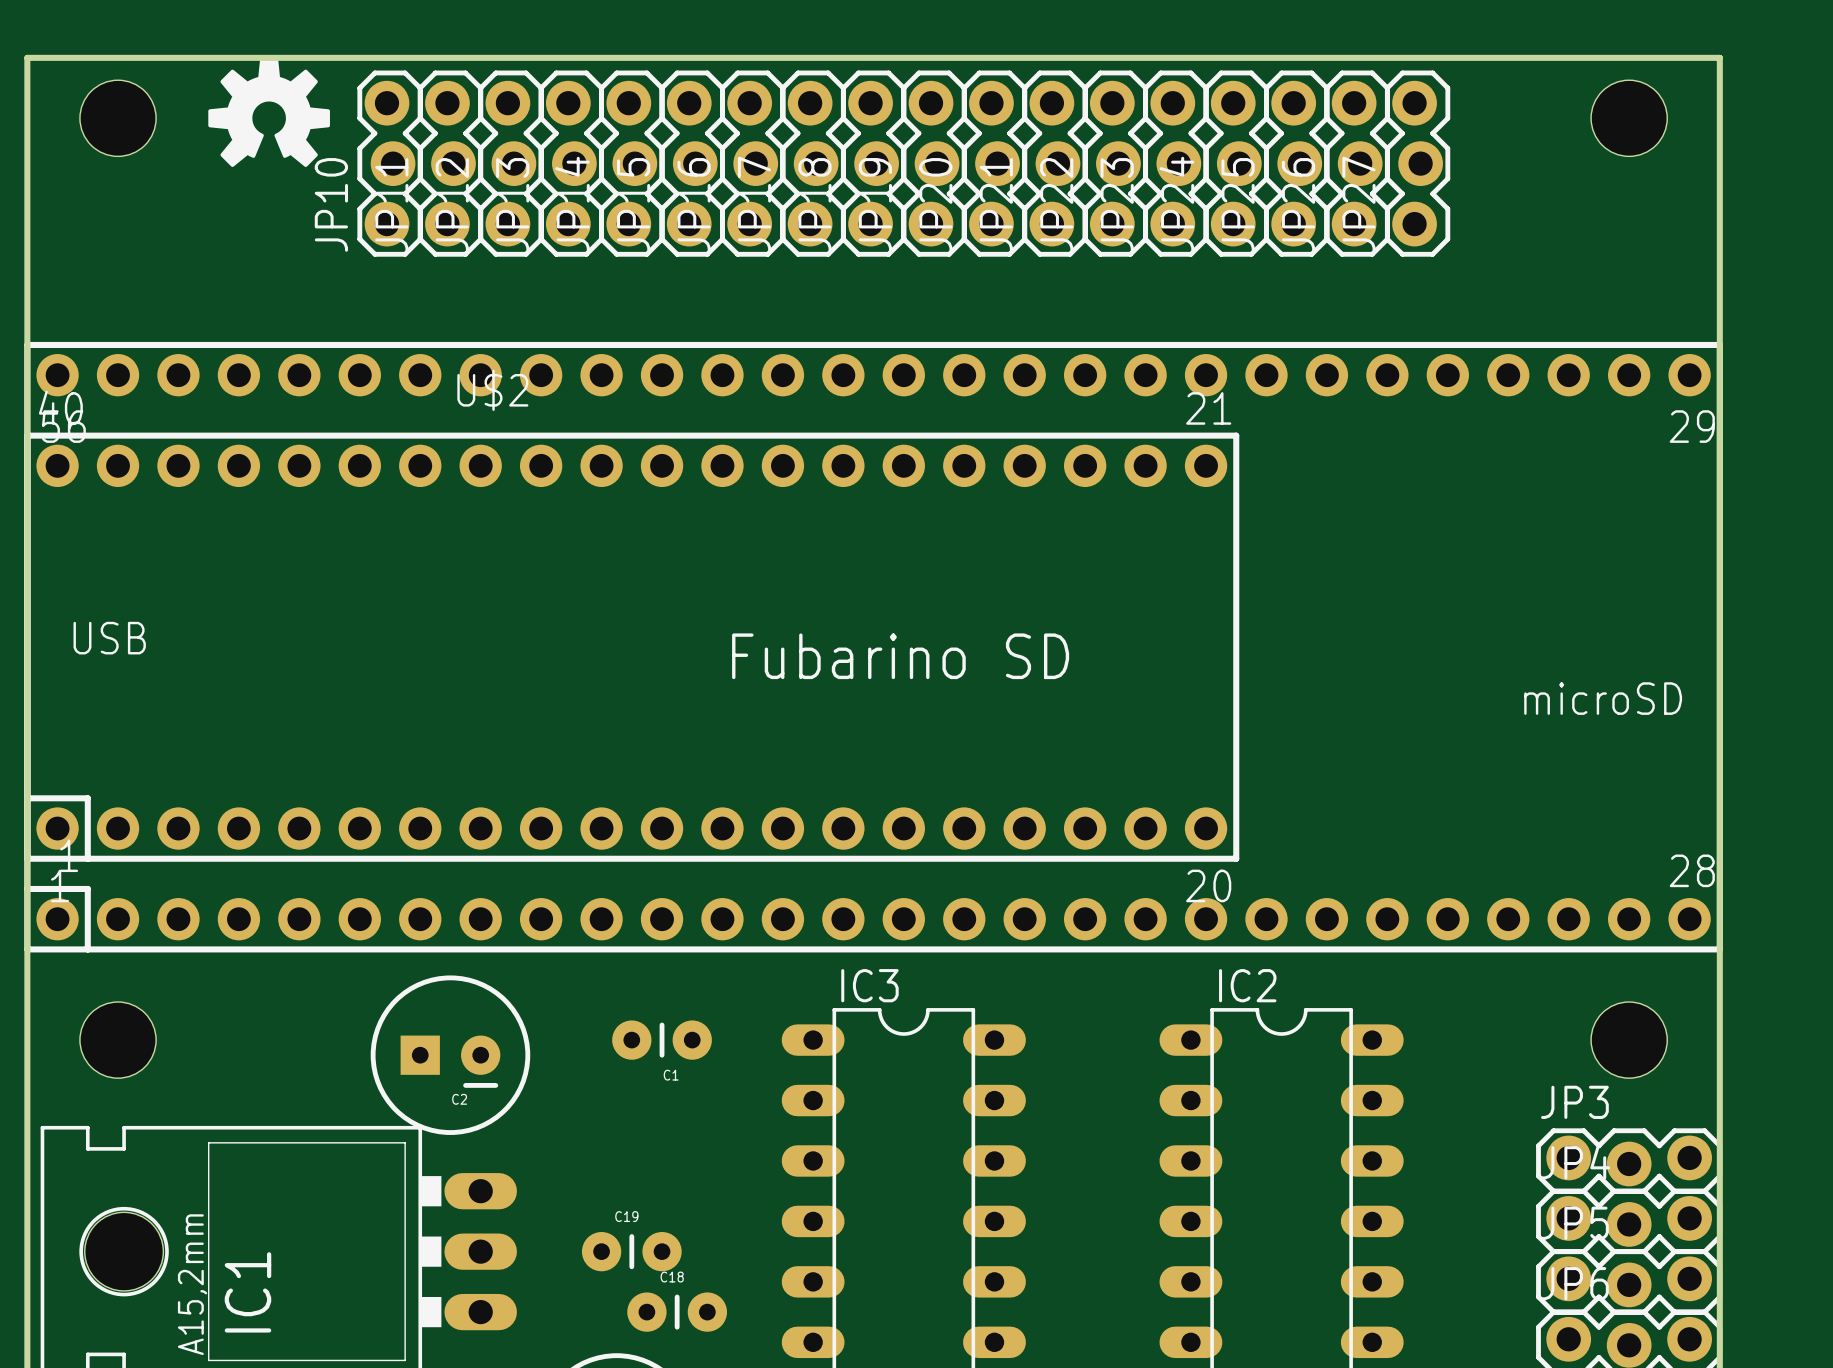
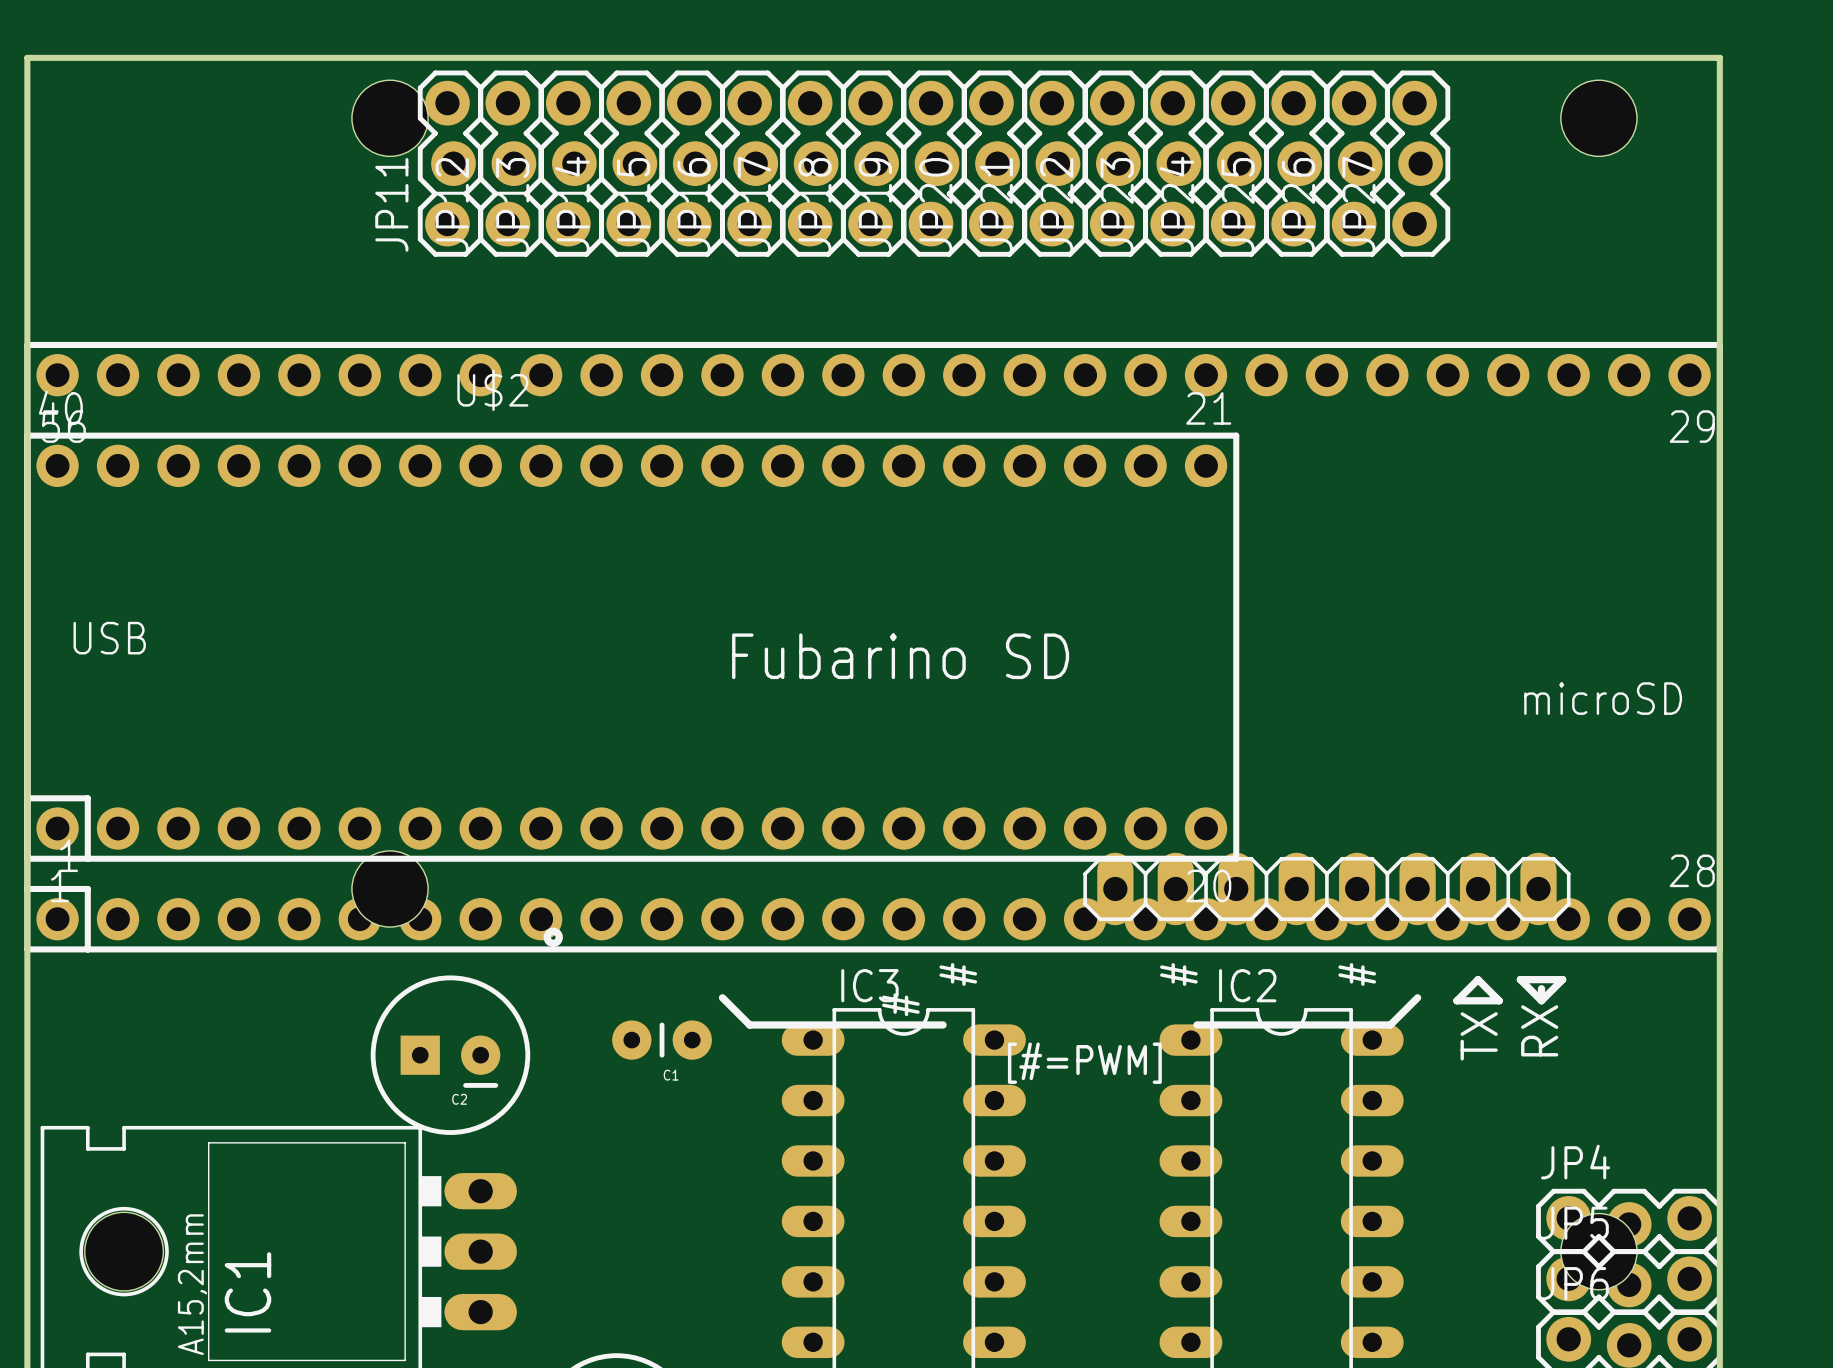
drawing: [208, 57, 330, 167] -> none
hole position: (118, 118) -> (390, 118)
hole position: (1629, 118) -> (1598, 118)
JP10: (390, 163) -> none
part: none -> (1326, 888)
drawing: none -> [543, 927, 563, 948]
text: none -> # (958, 974)
text: none -> # (1178, 974)
text: none -> # (1357, 974)
line: none -> (1478, 979) (1499, 1000) (1456, 1000) (1478, 979)
line: none -> (1520, 979) (1562, 979) (1541, 1000) (1520, 979)
line: none -> (1541, 988) (1541, 991)
line: none -> (722, 997) (749, 1024) (943, 1024)
line: none -> (1417, 997) (1390, 1024) (1196, 1024)
text: none -> # (900, 1004)
text: none -> RX (1539, 1030)
text: none -> TX (1479, 1036)
hole position: (118, 1040) -> (390, 888)
hole position: (1629, 1040) -> (1598, 1251)
text: none -> [#=PWM] (1084, 1063)
JP3: (1629, 1160) -> none
C19: (631, 1251) -> none
C18: (677, 1312) -> none

